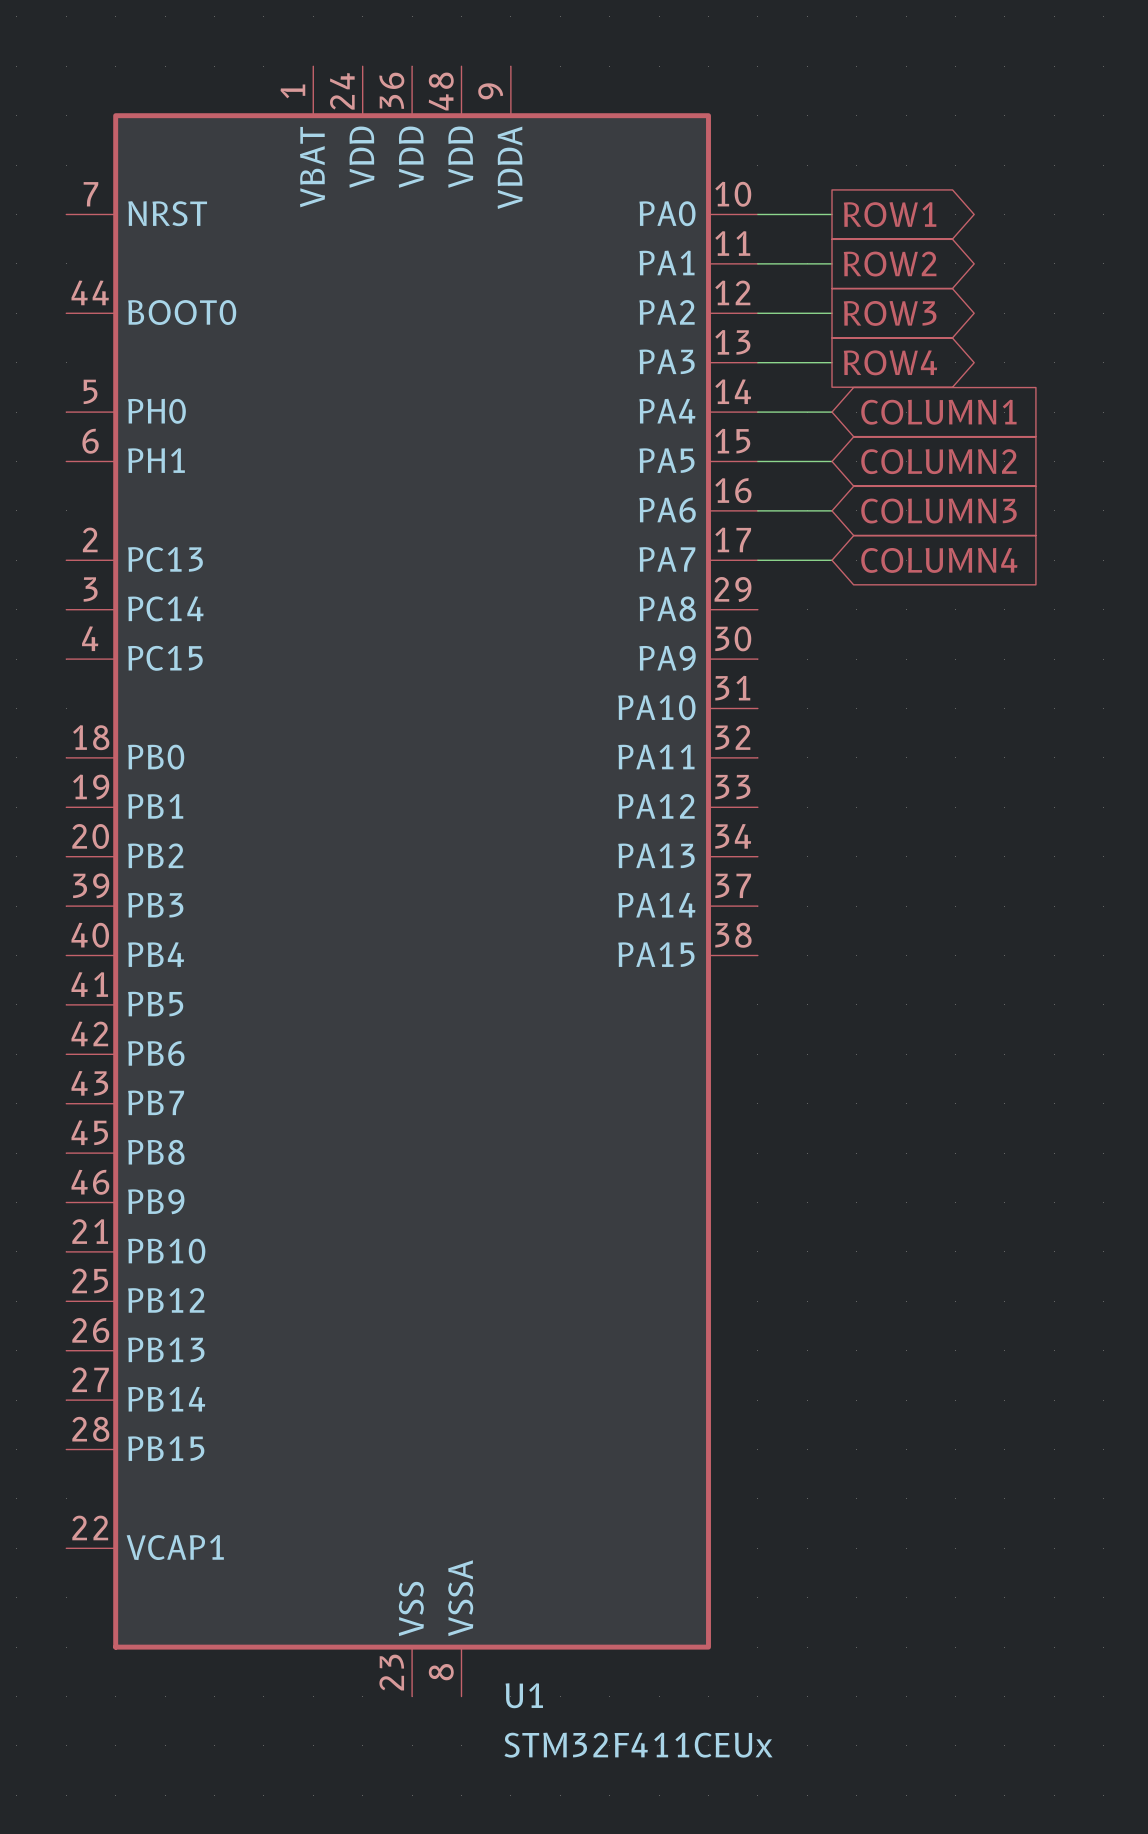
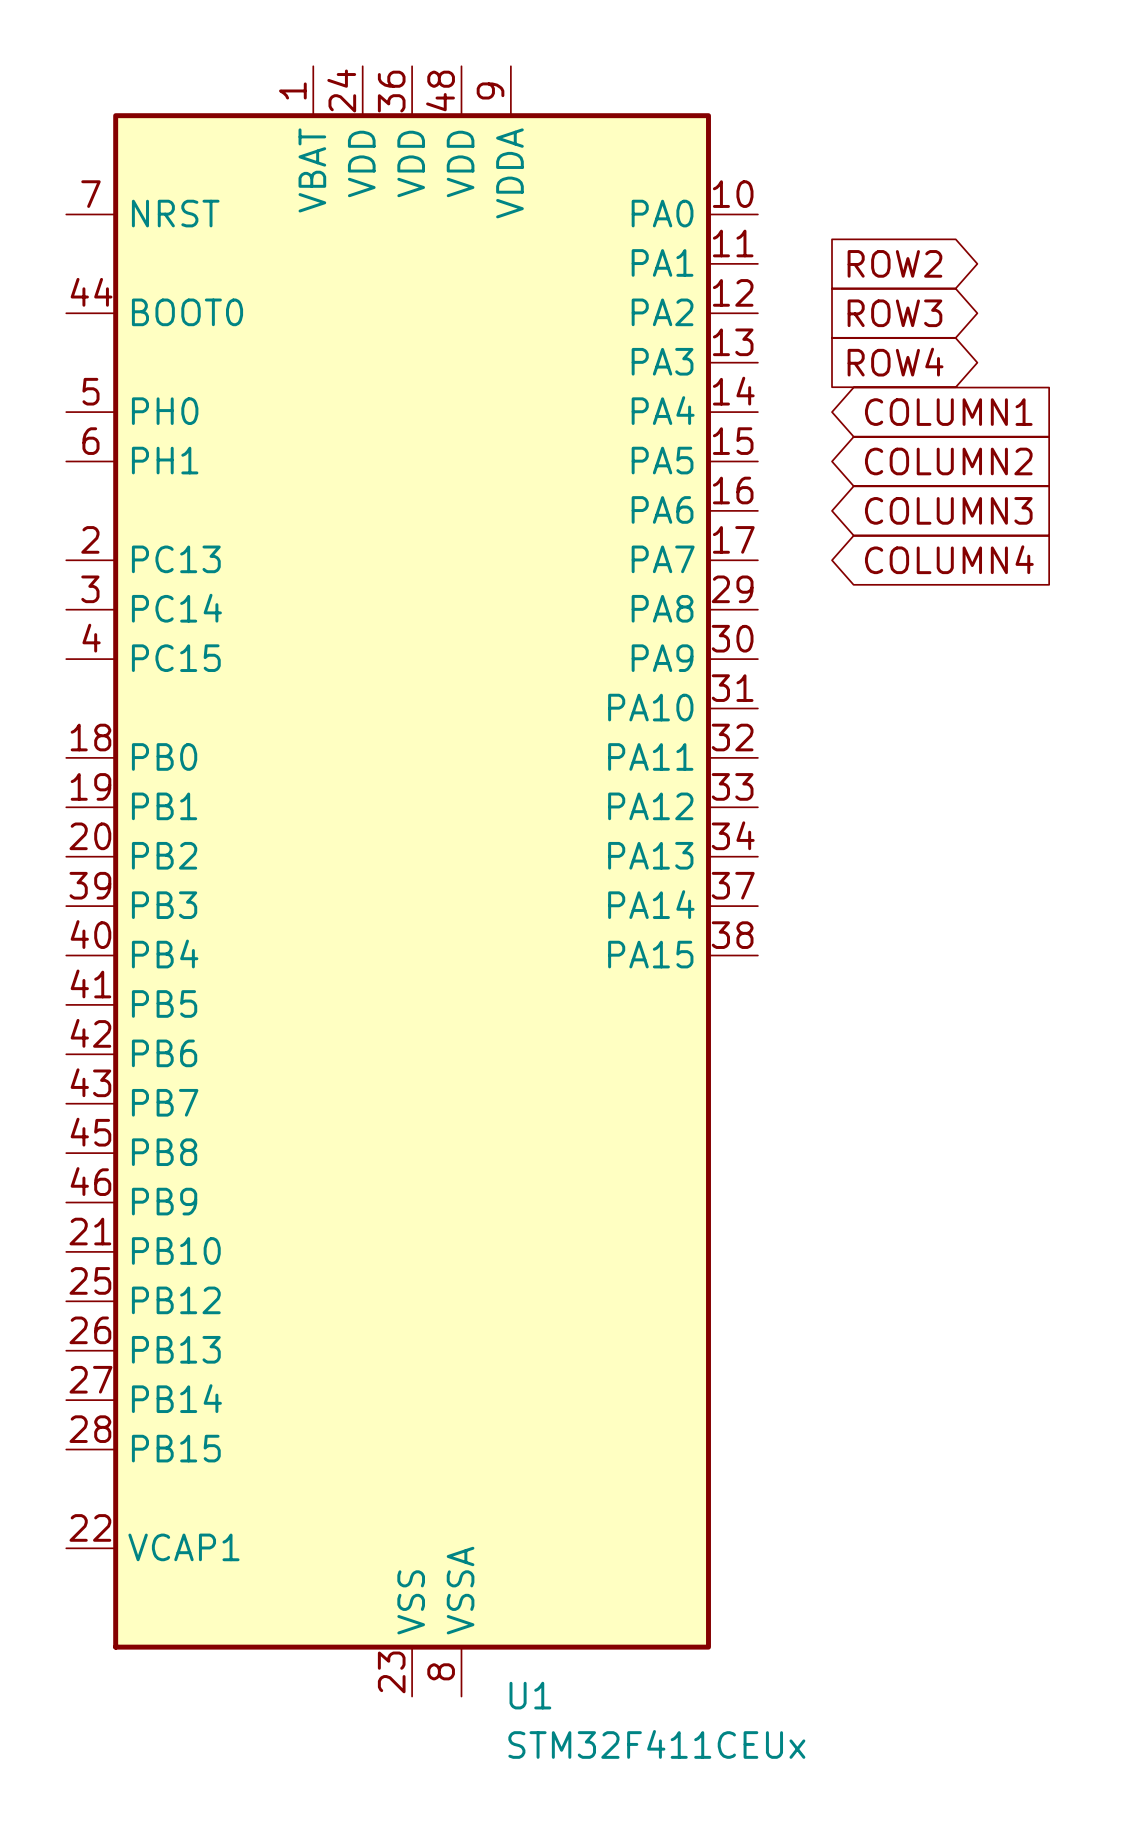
wire: (757, 214) (832, 214) -> none
global label: ROW1 (890, 214) -> none
wire: (757, 263) (832, 263) -> none
wire: (757, 313) (832, 313) -> none
wire: (757, 362) (832, 362) -> none
wire: (757, 412) (832, 412) -> none
wire: (757, 461) (832, 461) -> none
wire: (757, 510) (832, 510) -> none
wire: (757, 560) (832, 560) -> none

